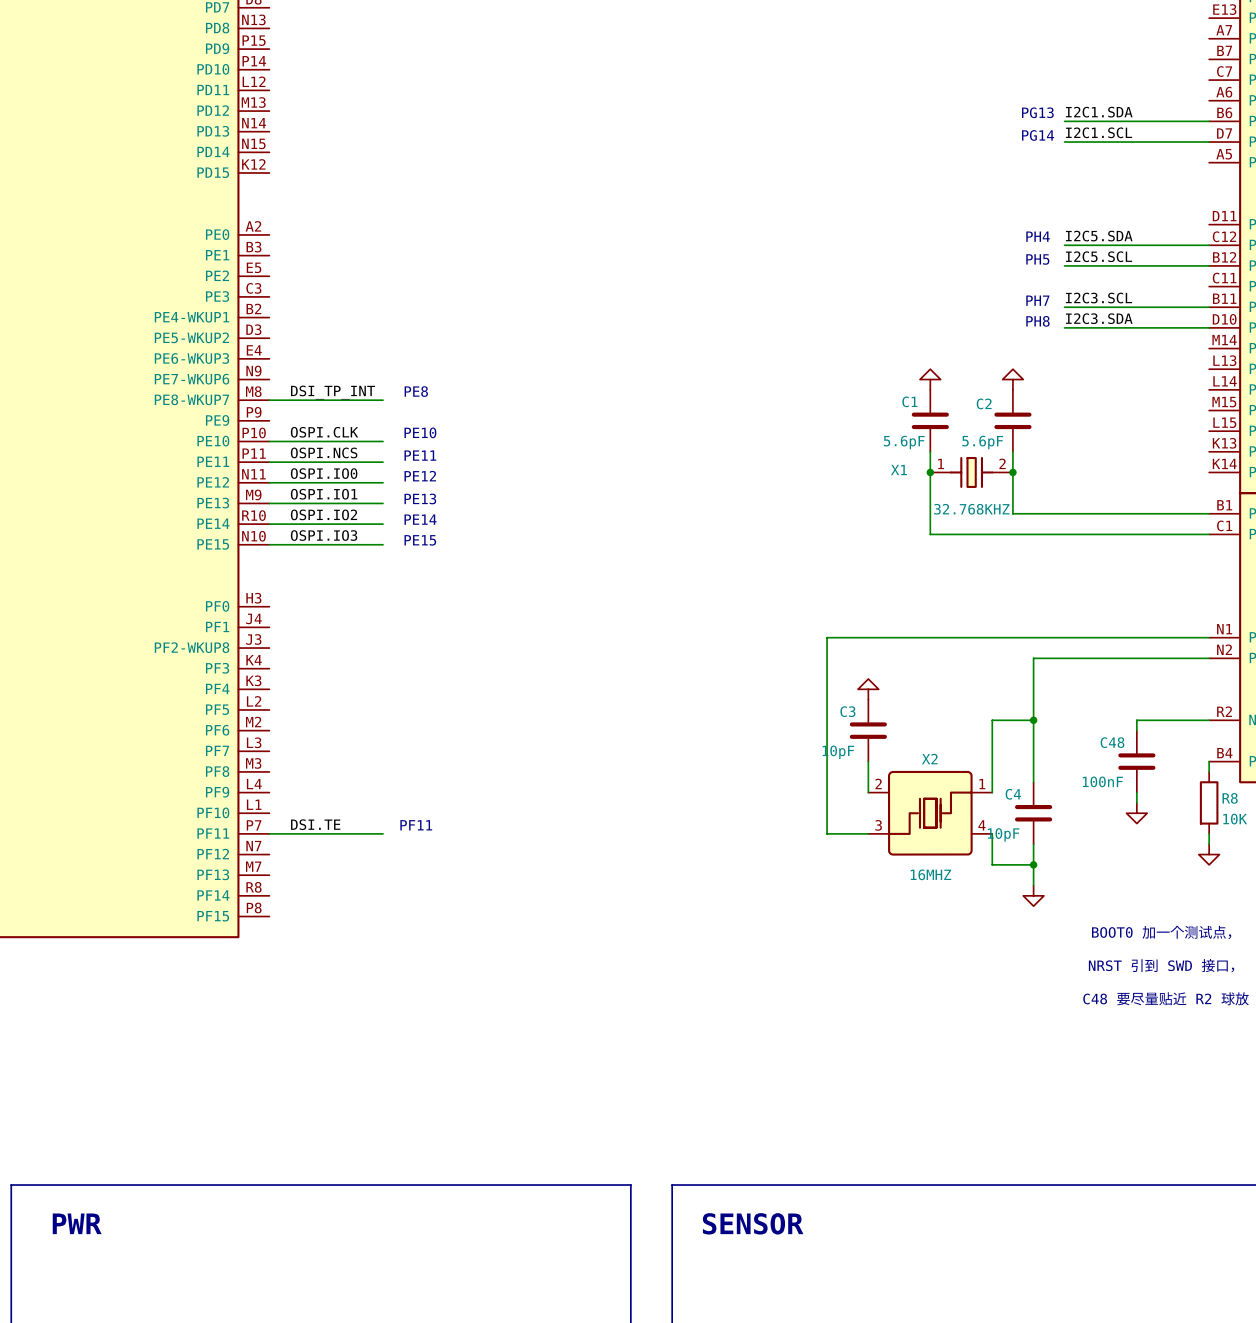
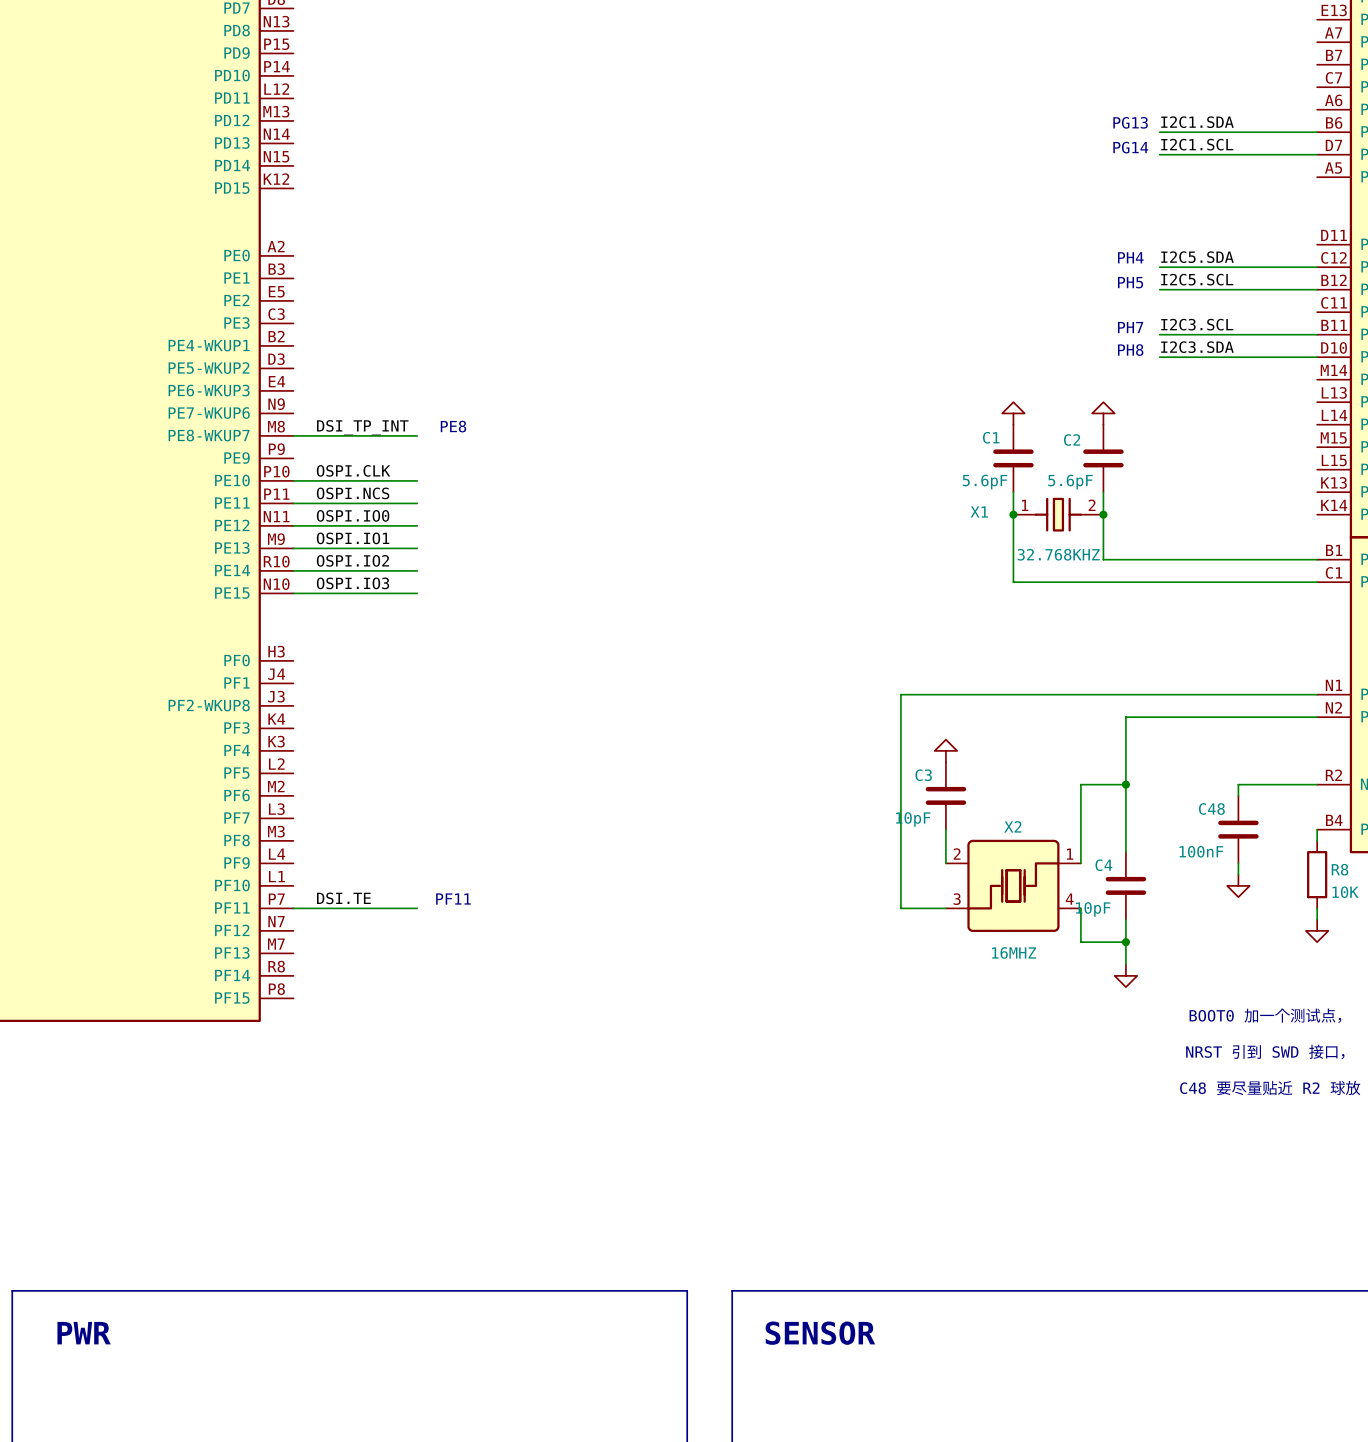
text: PE10 (420, 432) -> none
text: PE11 (420, 455) -> none
text: PE12 (420, 476) -> none
text: PE13 (420, 498) -> none
text: PE14 (420, 519) -> none
text: PE15 (420, 540) -> none

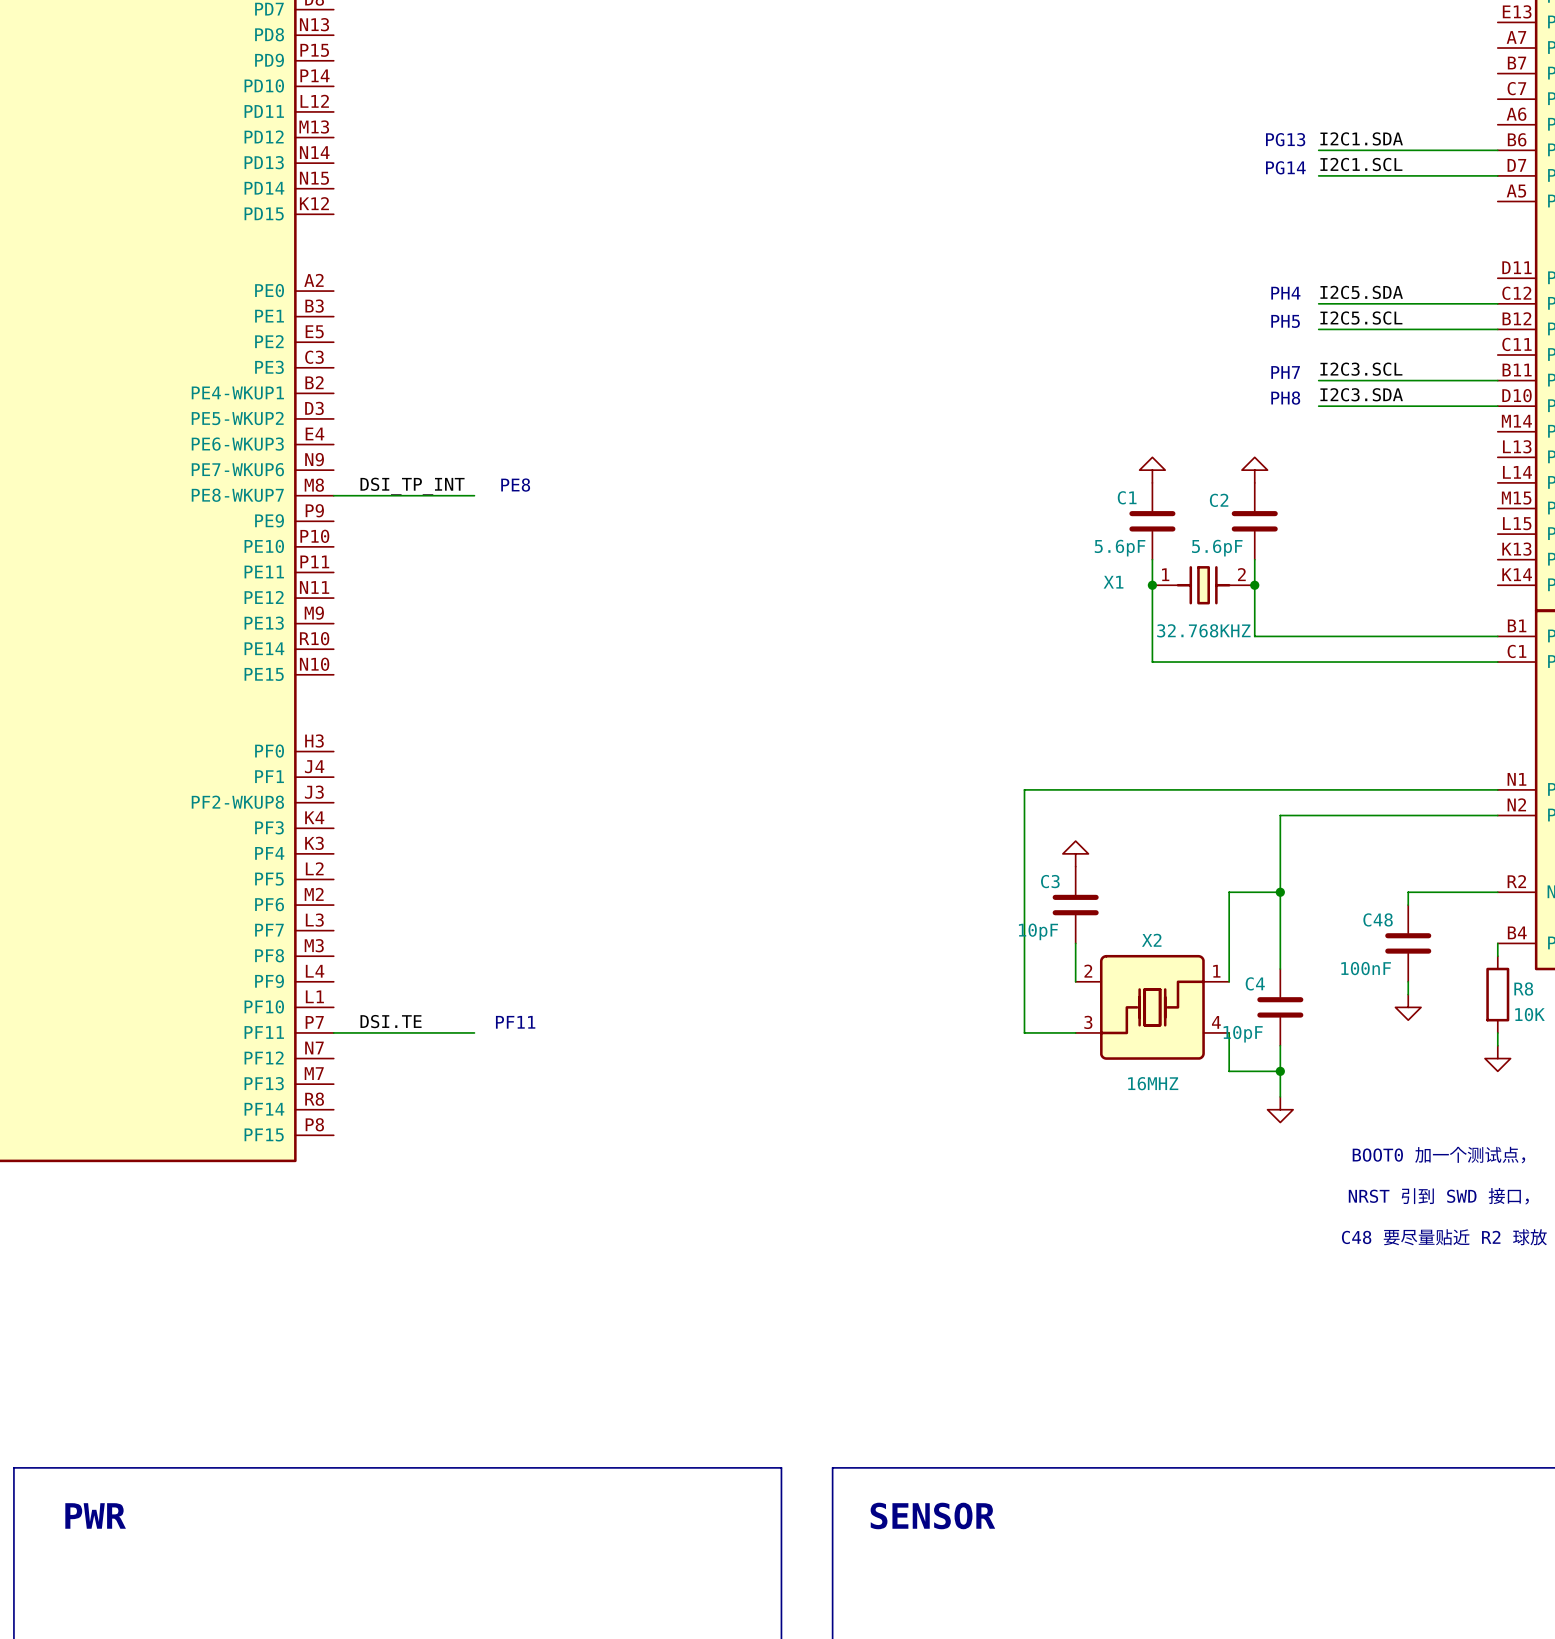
label: OSPI.CLK (353, 470) -> none
wire: (293, 480) (417, 480) -> none
label: OSPI.NCS (353, 493) -> none
wire: (293, 503) (417, 503) -> none
label: OSPI.IO0 (353, 515) -> none
wire: (293, 525) (417, 525) -> none
label: OSPI.IO1 (353, 538) -> none
wire: (293, 548) (417, 548) -> none
label: OSPI.IO2 (352, 560) -> none
wire: (293, 570) (417, 570) -> none
label: OSPI.IO3 (353, 583) -> none
wire: (293, 593) (417, 593) -> none

